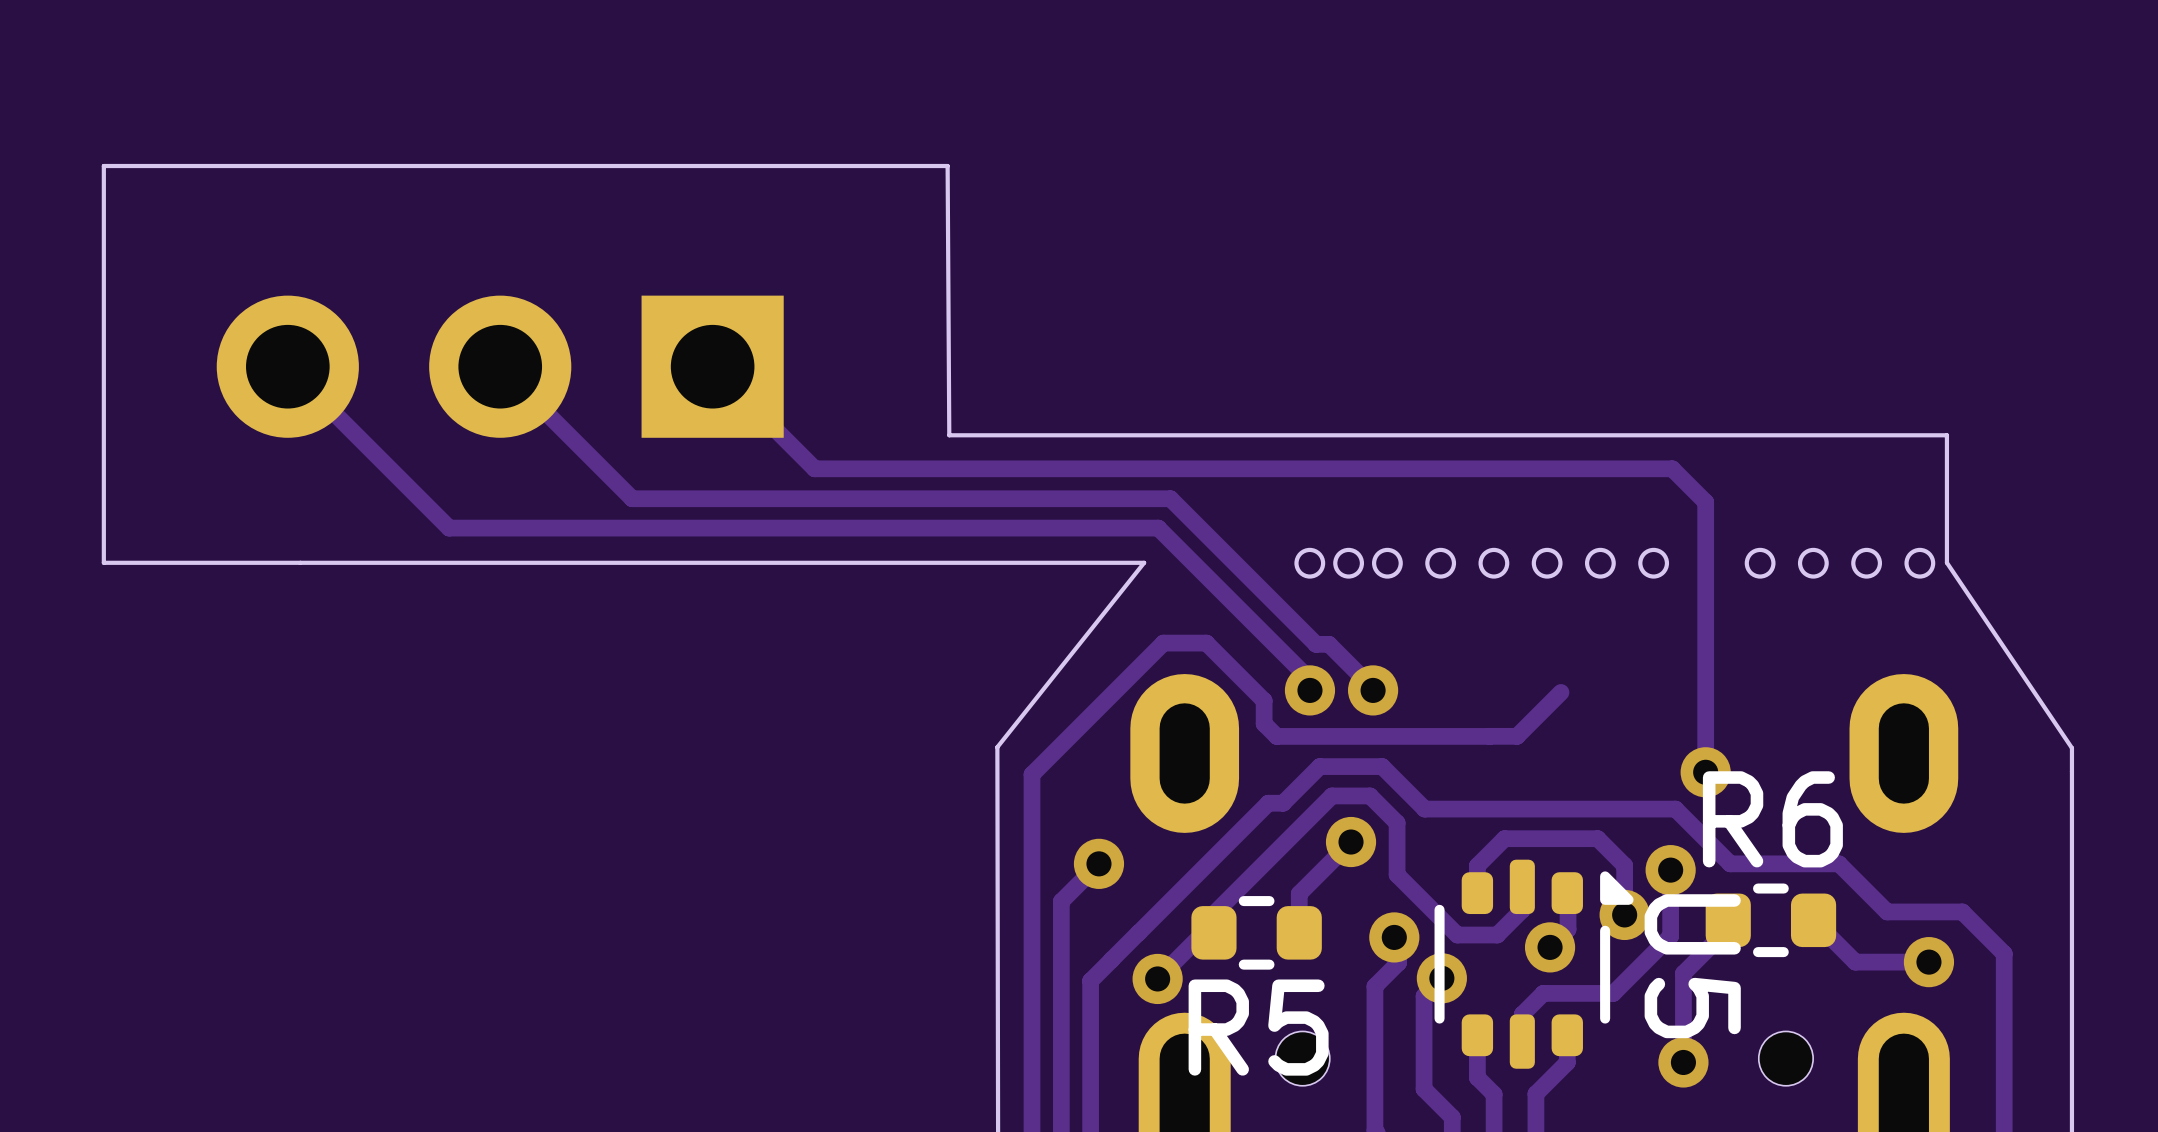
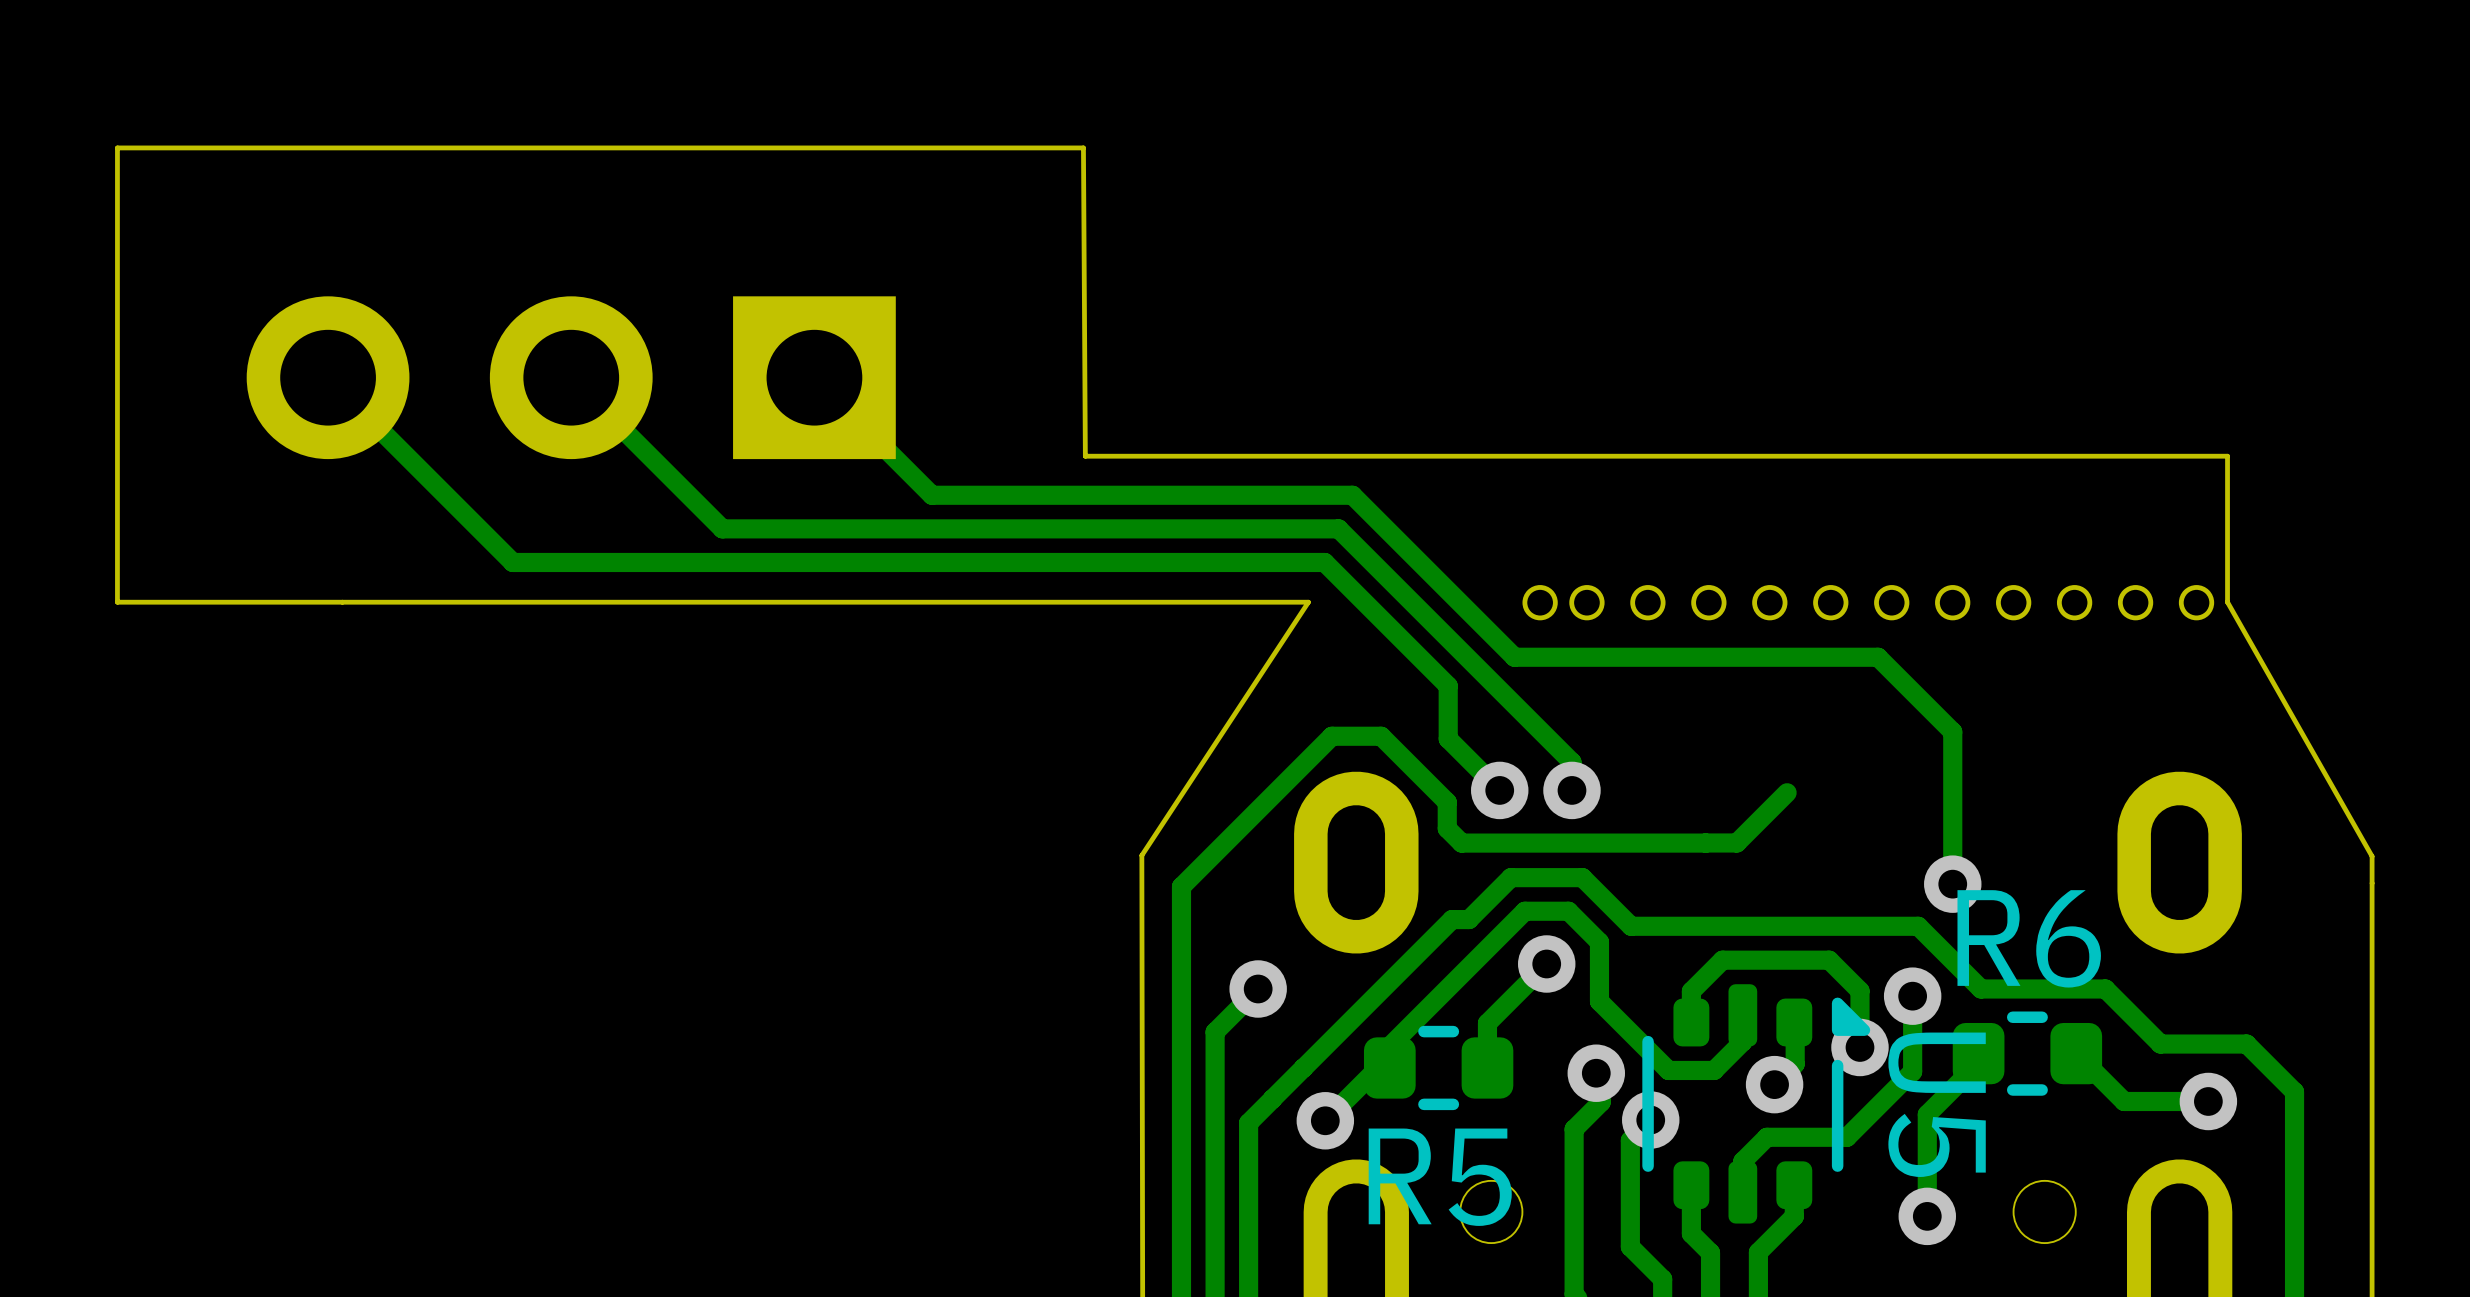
track: (287, 366) (449, 528) (1158, 528) (1309, 679) (1309, 690) -> (328, 377) (512, 562) (1324, 562) (1448, 685) (1448, 738) (1499, 790)
track: (500, 366) (632, 498) (1170, 498) (1316, 644) (1329, 644) (1373, 688) -> (571, 377) (722, 528) (1338, 528) (1571, 762) (1571, 788)
part position: (500, 366) -> (571, 377)
track: (712, 366) (814, 468) (1672, 468) (1705, 502) (1705, 639) -> (814, 377) (931, 495) (1352, 495) (1514, 657) (1878, 657) (1952, 731)
round board edge: none -> [1522, 585, 1558, 621]
round board edge: none -> [1569, 585, 1605, 621]
round board edge: none -> [1630, 585, 1666, 621]
round board edge: none -> [1691, 585, 1727, 621]
round board edge: none -> [1752, 585, 1788, 621]
round board edge: none -> [1813, 585, 1849, 621]
round board edge: none -> [1874, 585, 1910, 621]
round board edge: none -> [1935, 585, 1971, 621]
round board edge: none -> [1996, 585, 2032, 621]
round board edge: none -> [2056, 585, 2093, 621]
round board edge: none -> [2117, 585, 2154, 621]
round board edge: none -> [2178, 585, 2215, 621]
round board edge: [1294, 547, 1326, 579] -> none
round board edge: [1333, 547, 1365, 579] -> none
round board edge: [1372, 547, 1403, 579] -> none
round board edge: [1425, 547, 1457, 579] -> none
round board edge: [1478, 547, 1510, 579] -> none
round board edge: [1531, 547, 1563, 579] -> none
round board edge: [1584, 547, 1616, 579] -> none
round board edge: [1638, 547, 1670, 579] -> none
round board edge: [1744, 547, 1776, 579] -> none
round board edge: [1797, 547, 1829, 579] -> none
round board edge: [1851, 547, 1883, 579] -> none
round board edge: [1904, 547, 1936, 579] -> none
board edge: (997, 747) (1144, 562) (103, 562) (103, 166) (947, 166) (949, 435) (1946, 435) (1946, 562) (2071, 748) -> (1141, 855) (1308, 602) (117, 602) (117, 147) (1083, 147) (1085, 456) (2227, 456) (2227, 602) (2372, 856)

